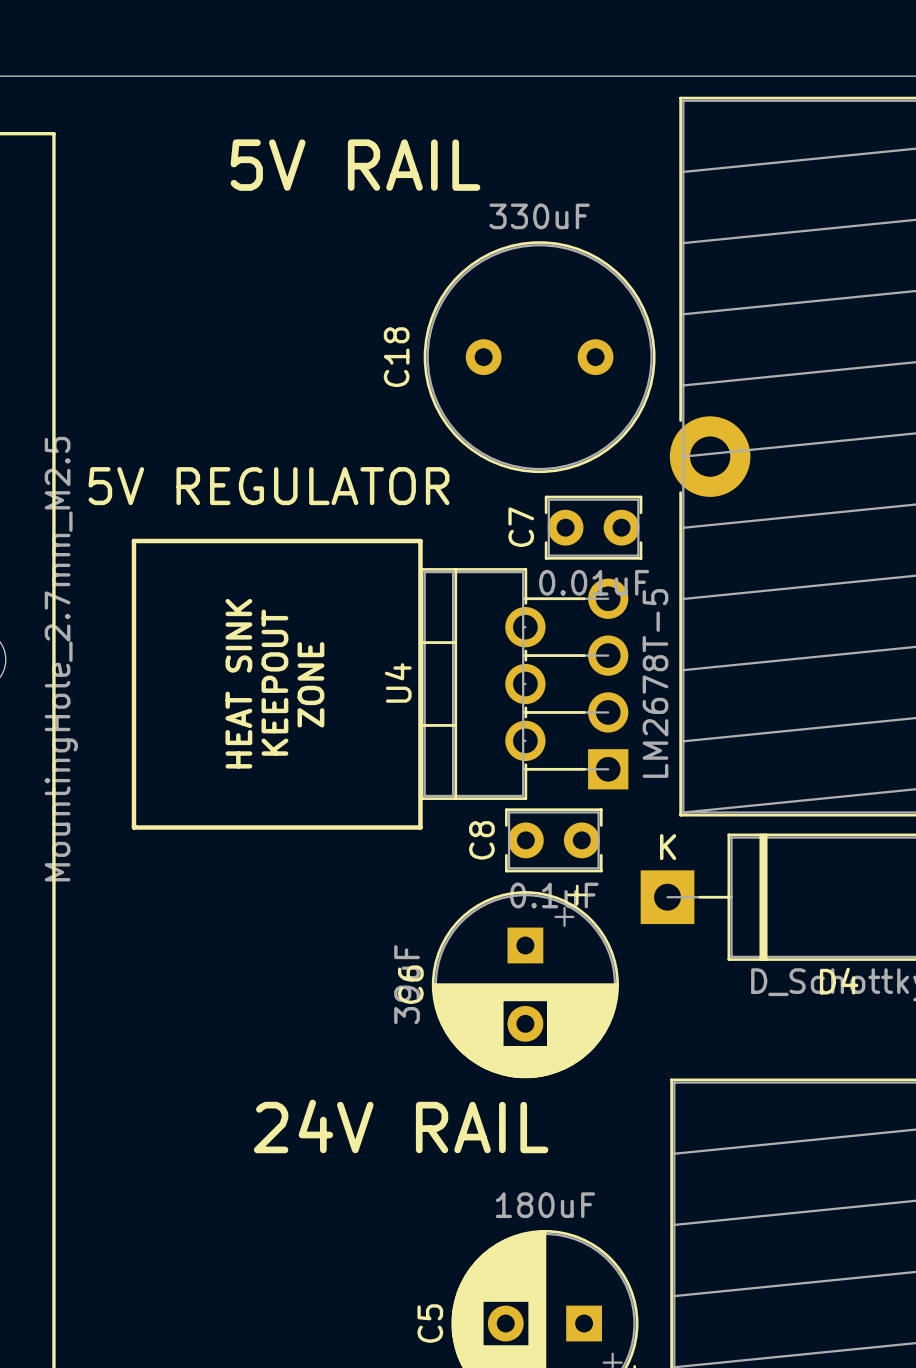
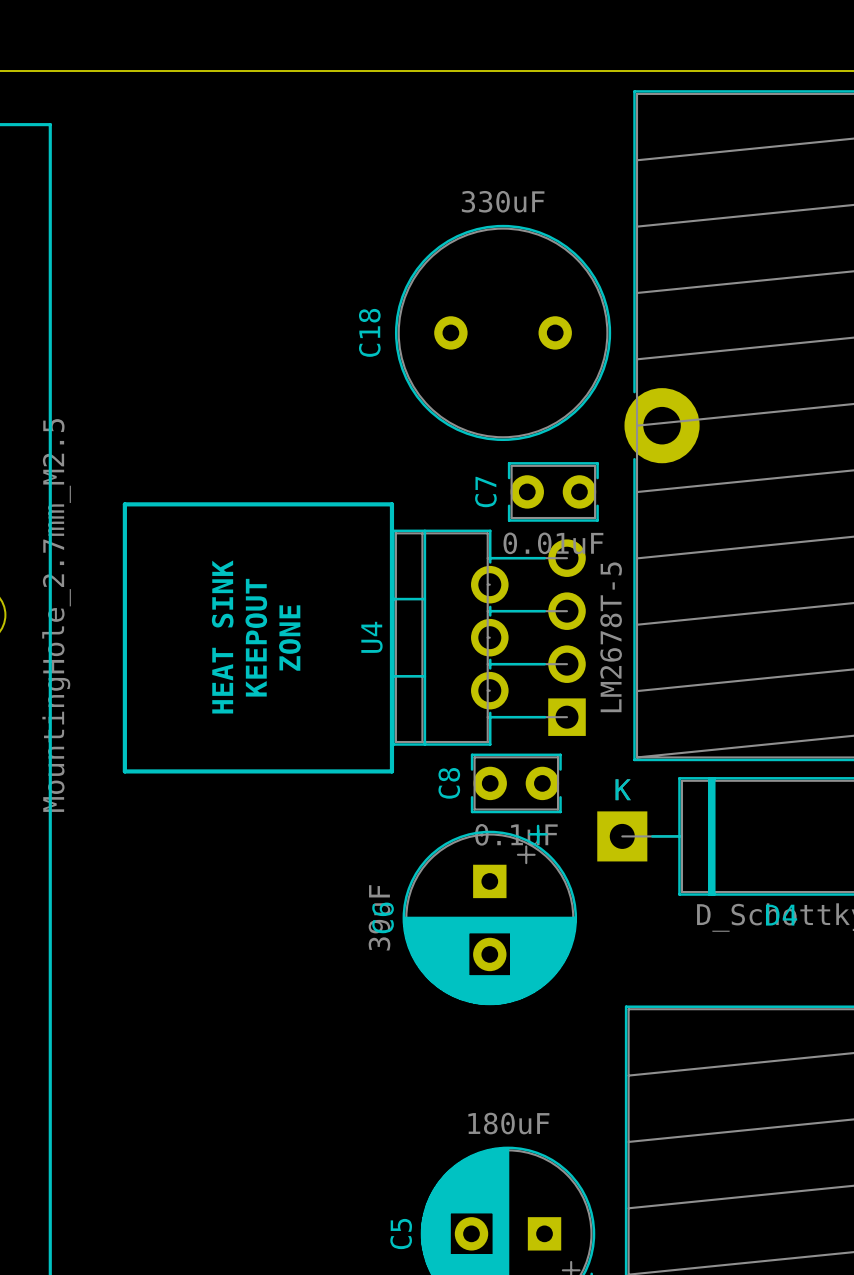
text: 5V RAIL (355, 165) -> none
text: 5V REGULATOR (269, 486) -> none
text: 24V RAIL (401, 1126) -> none

